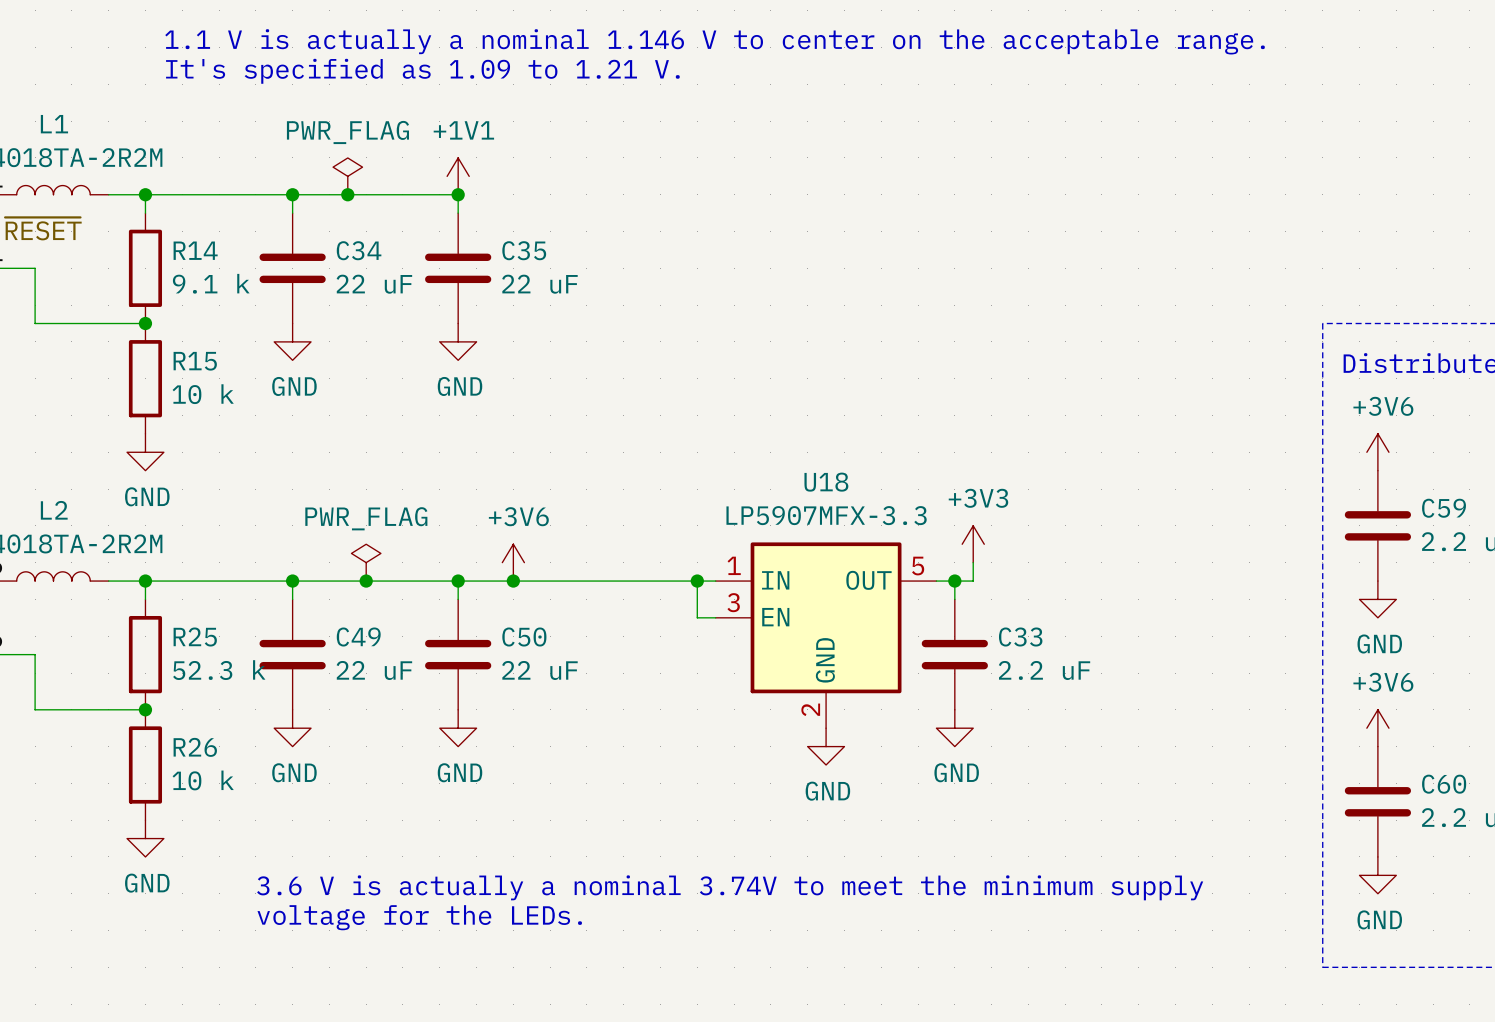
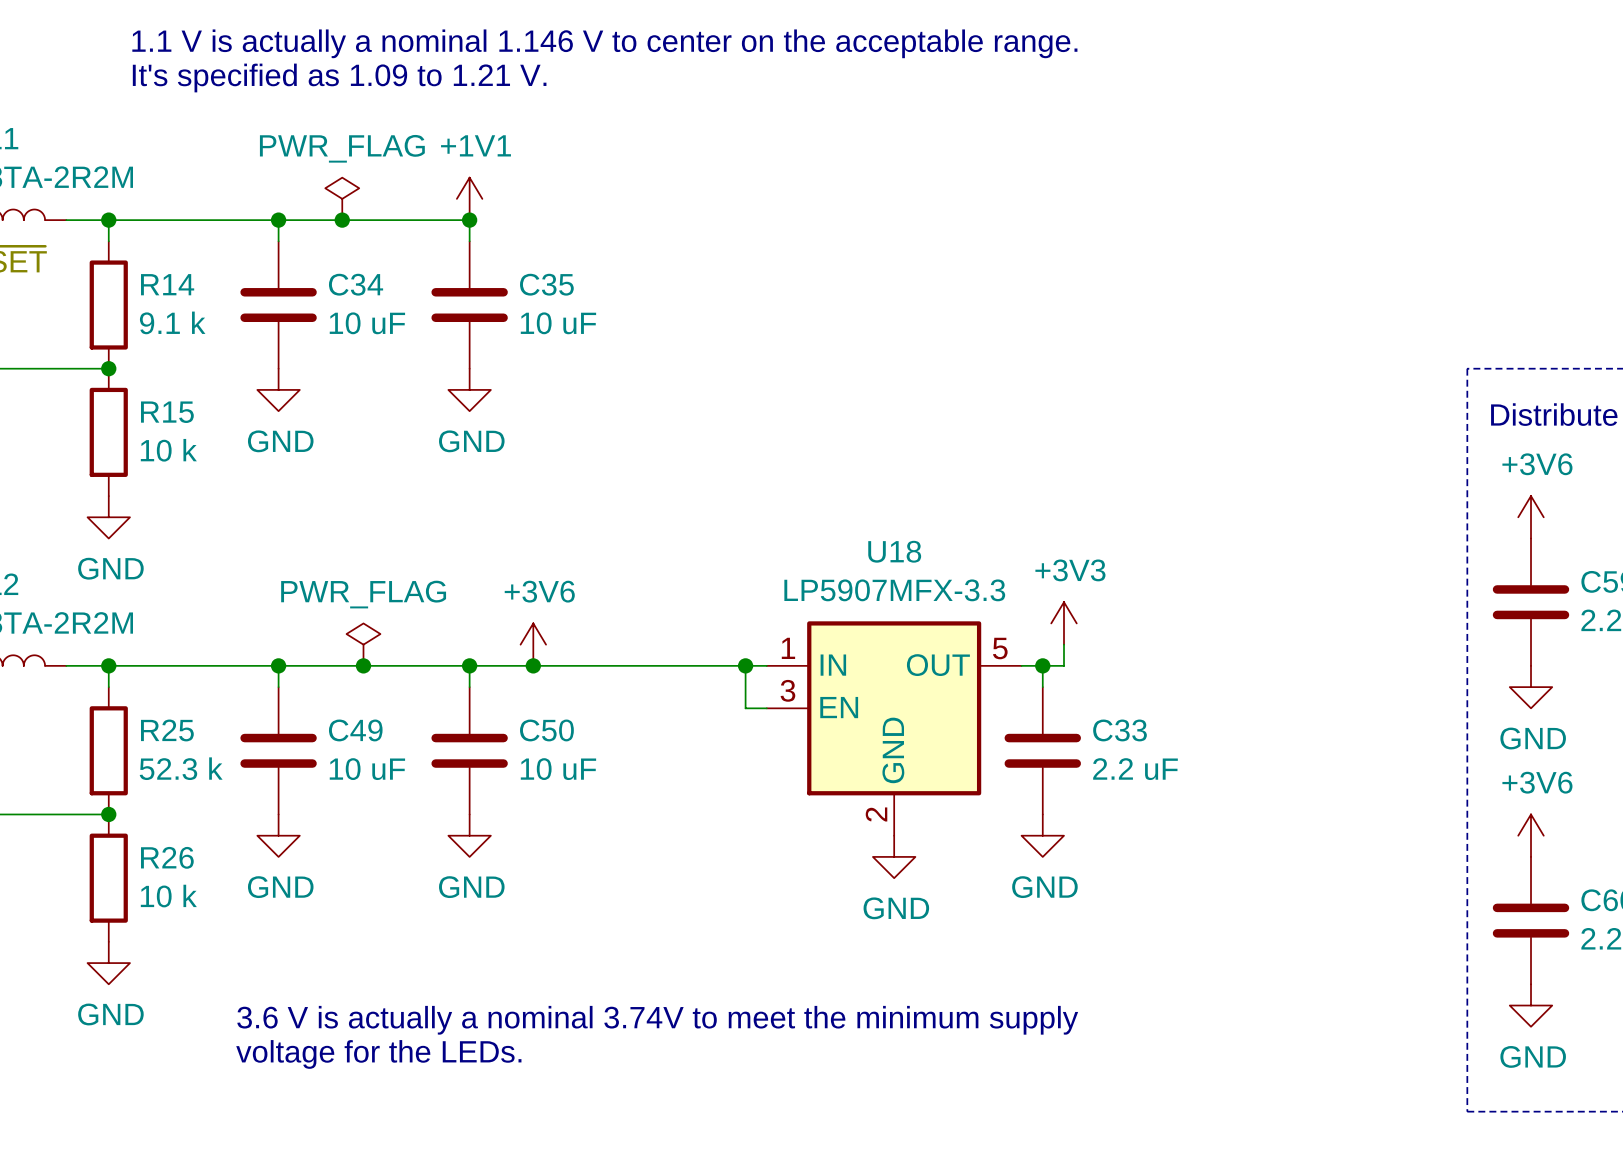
C34 value: 22 uF (374, 284) -> 10 uF (367, 323)
C35 value: 22 uF (539, 284) -> 10 uF (558, 323)
C49 value: 22 uF (374, 670) -> 10 uF (367, 769)
C50 value: 22 uF (539, 670) -> 10 uF (558, 769)

